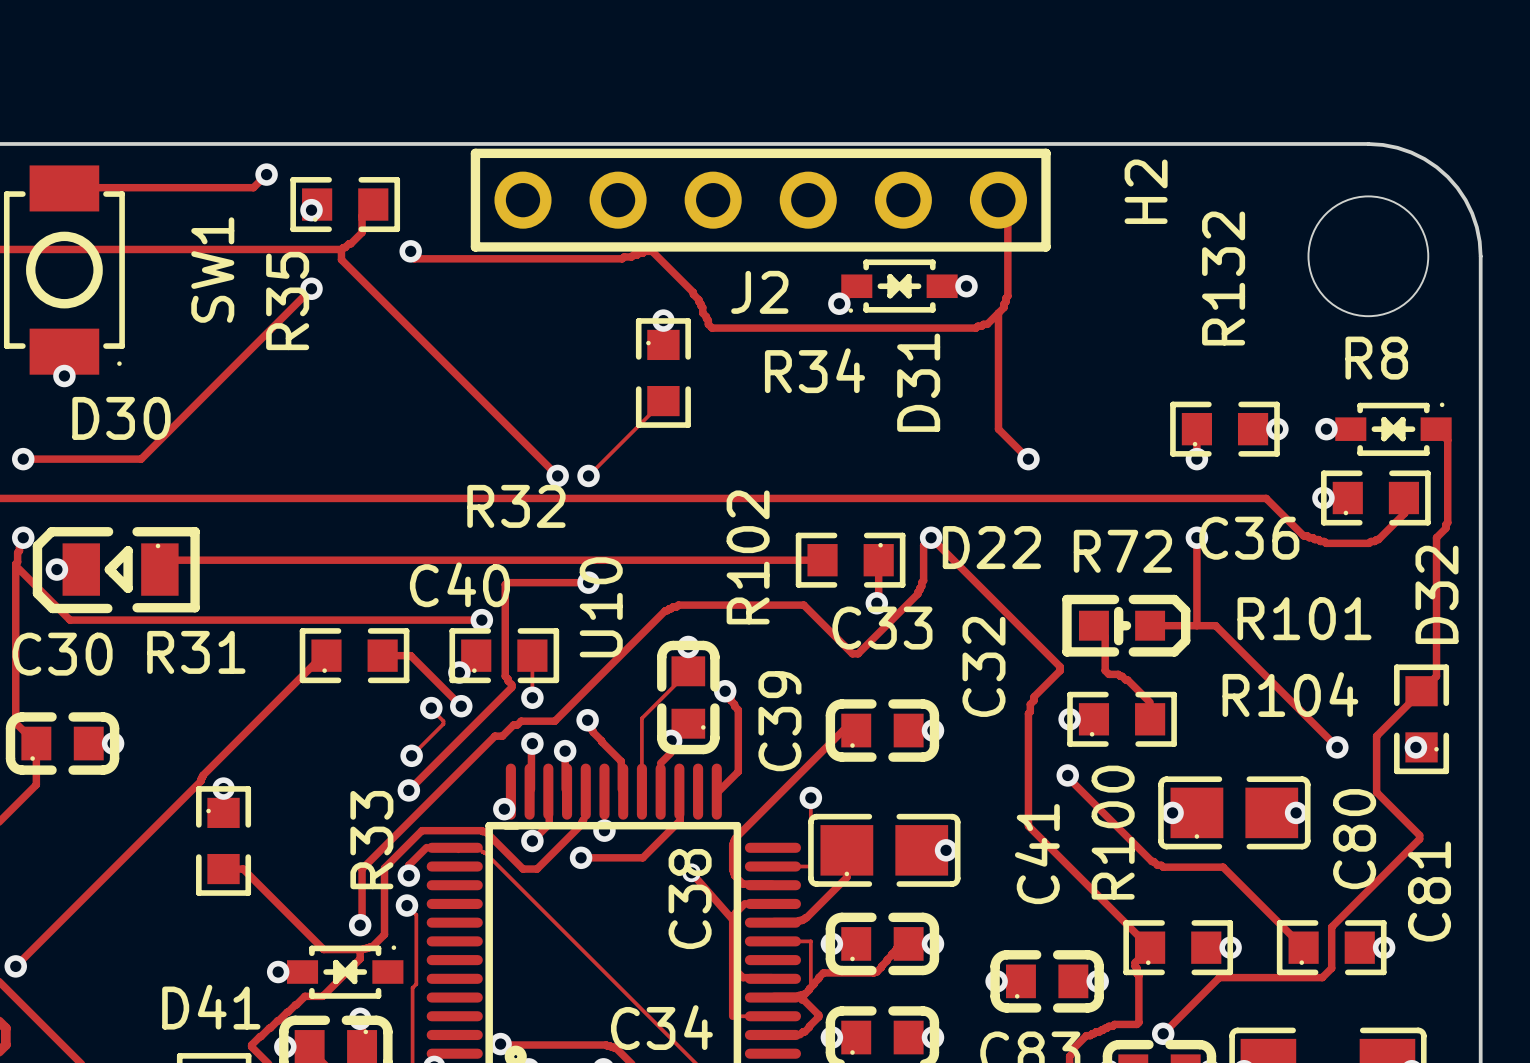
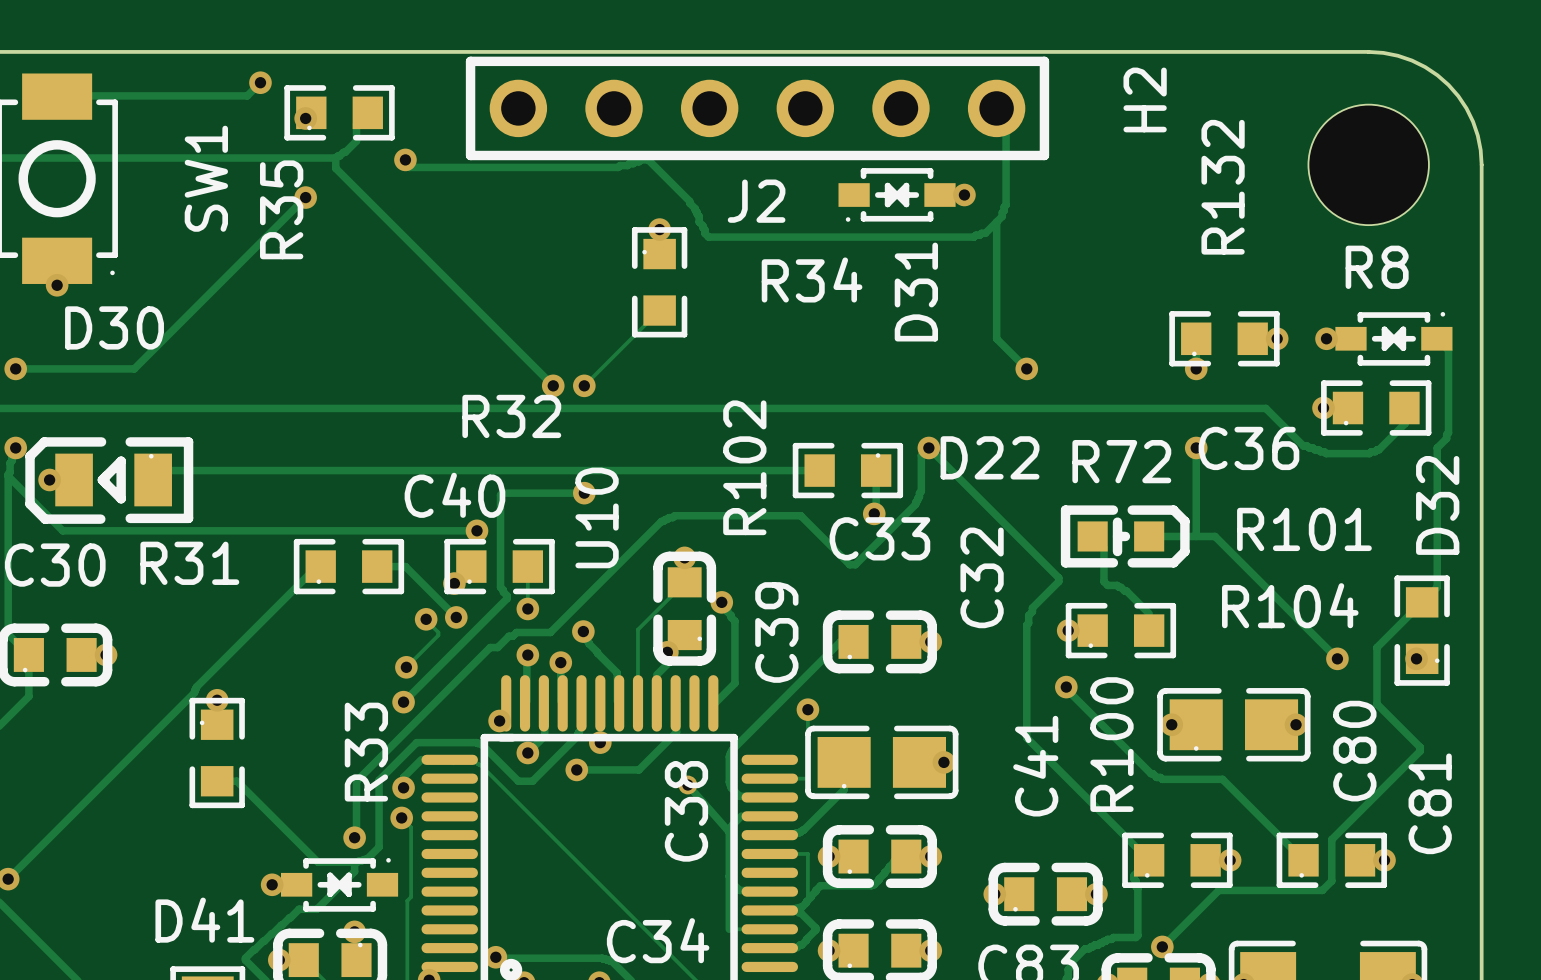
via: (839, 303) -> none

